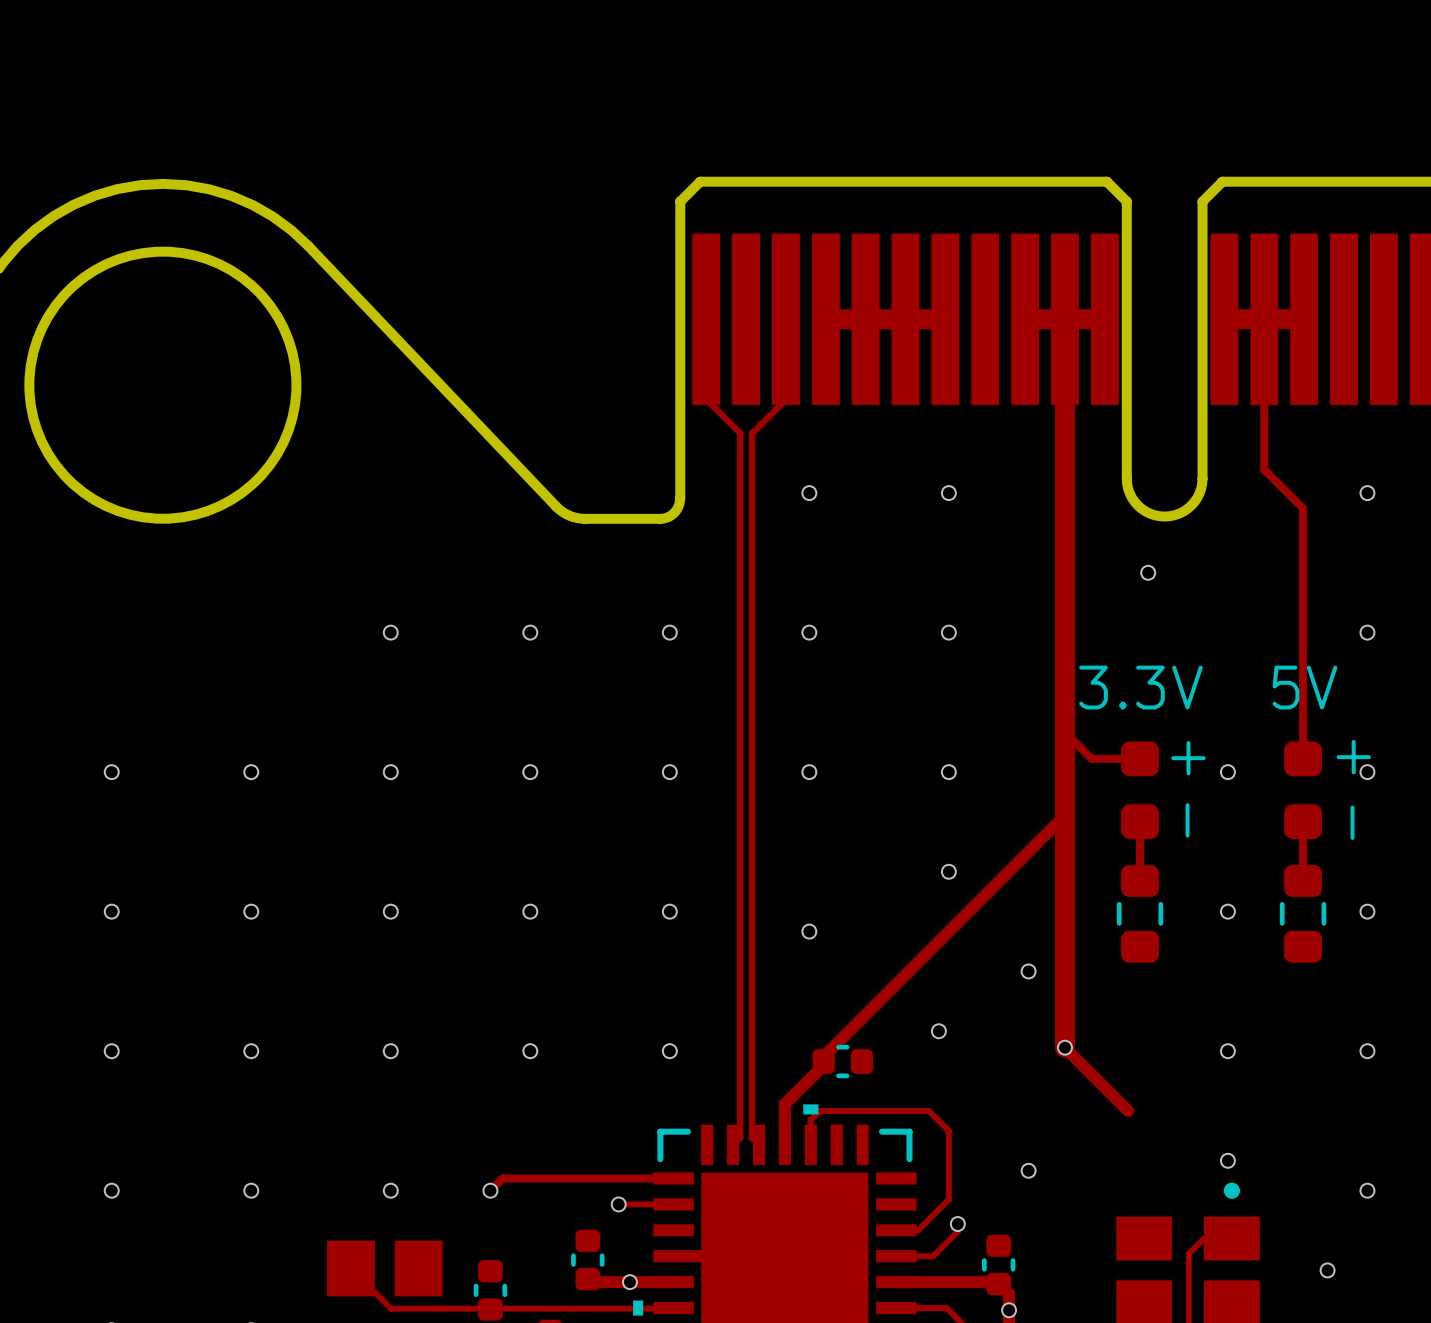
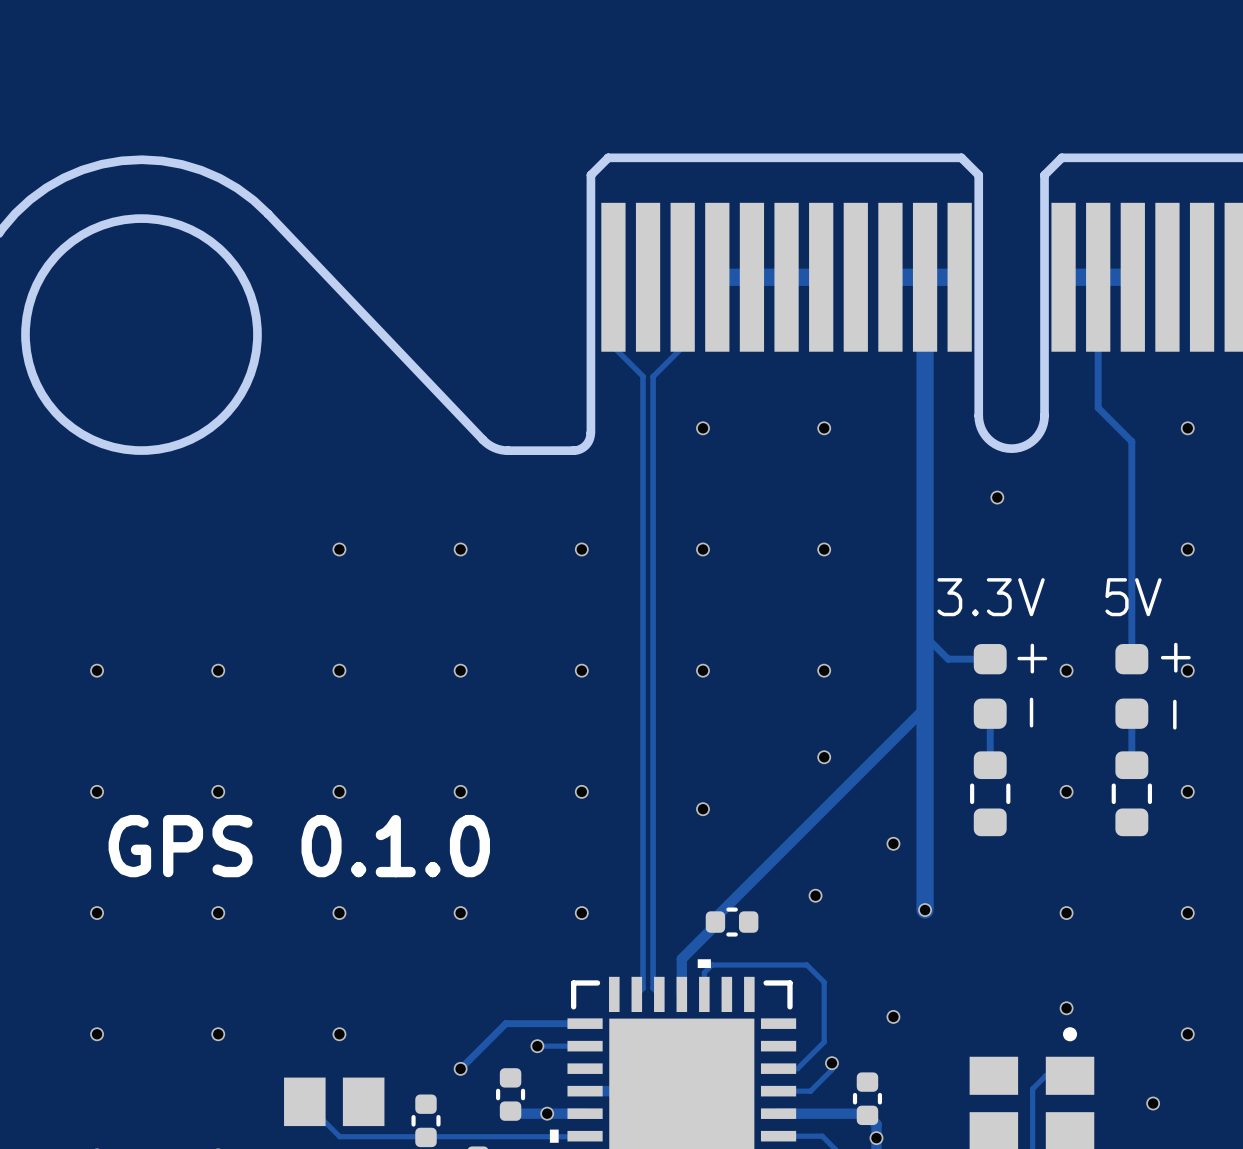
text: none -> GPS 0.1.0 (299, 846)
track: (1065, 1047) (1128, 1110) -> none
track: (582, 1178) (502, 1178) (490, 1190) -> (505, 1023) (460, 1068)
via position: (490, 1190) -> (460, 1068)

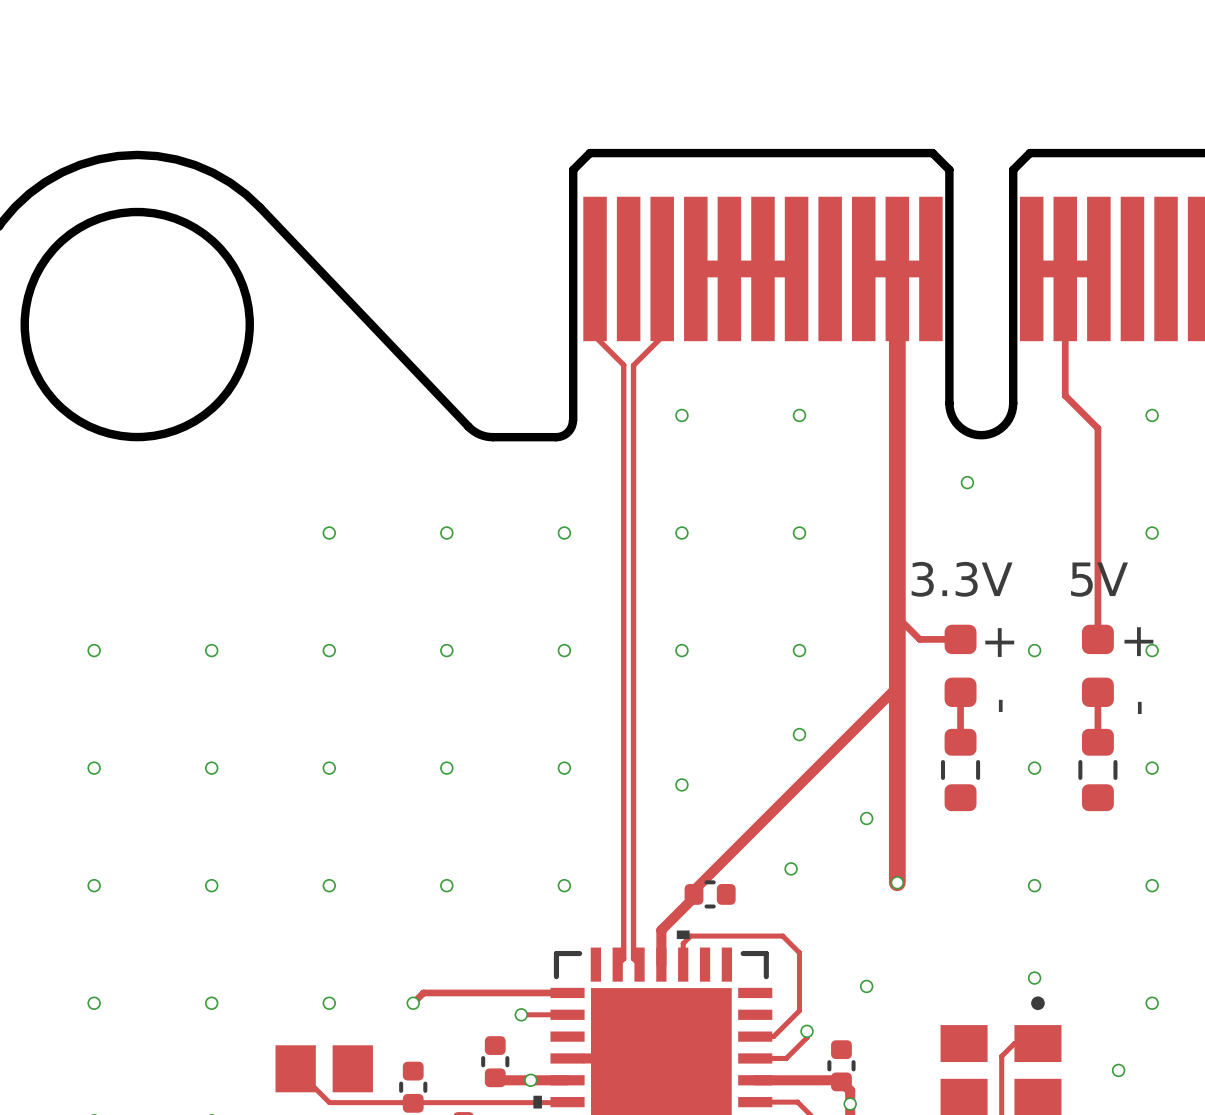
text: GPS 0.1.0 (299, 846) -> none
track: (505, 1023) (460, 1068) -> (490, 992) (423, 992) (413, 1003)
via position: (460, 1068) -> (413, 1003)

